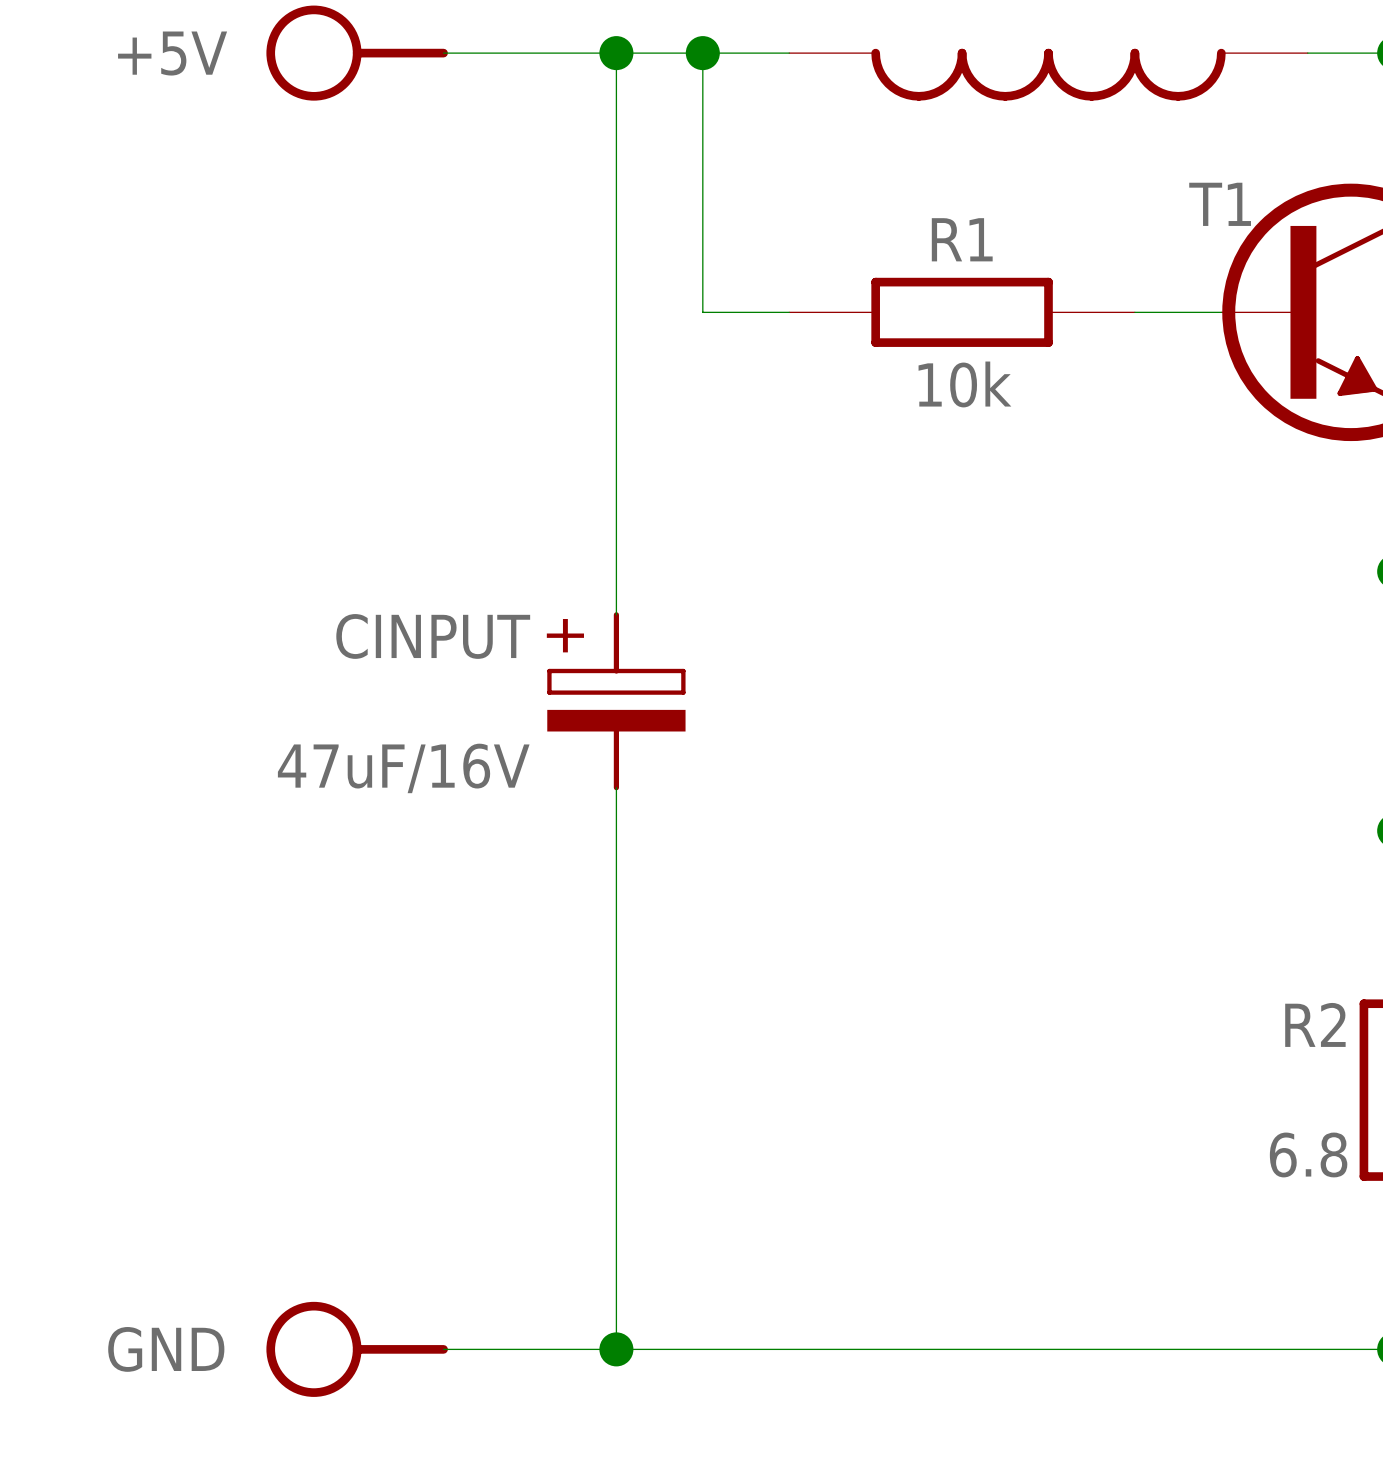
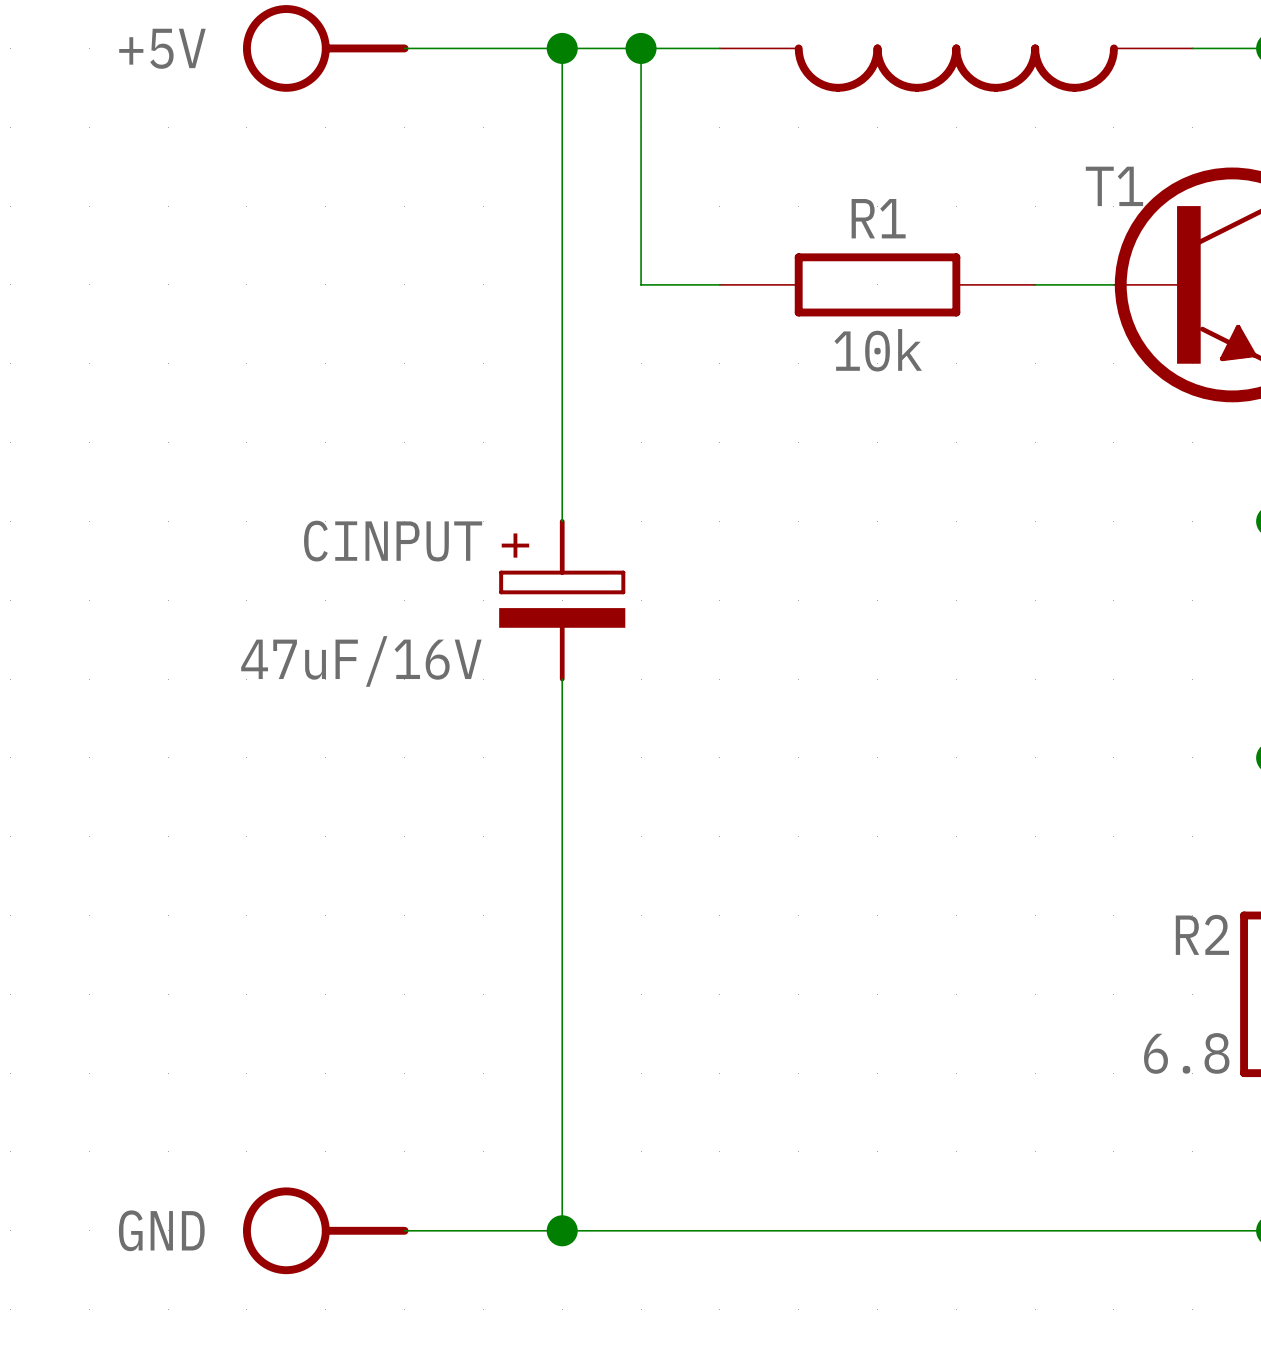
CINPUT position: (616, 701) -> (562, 600)

